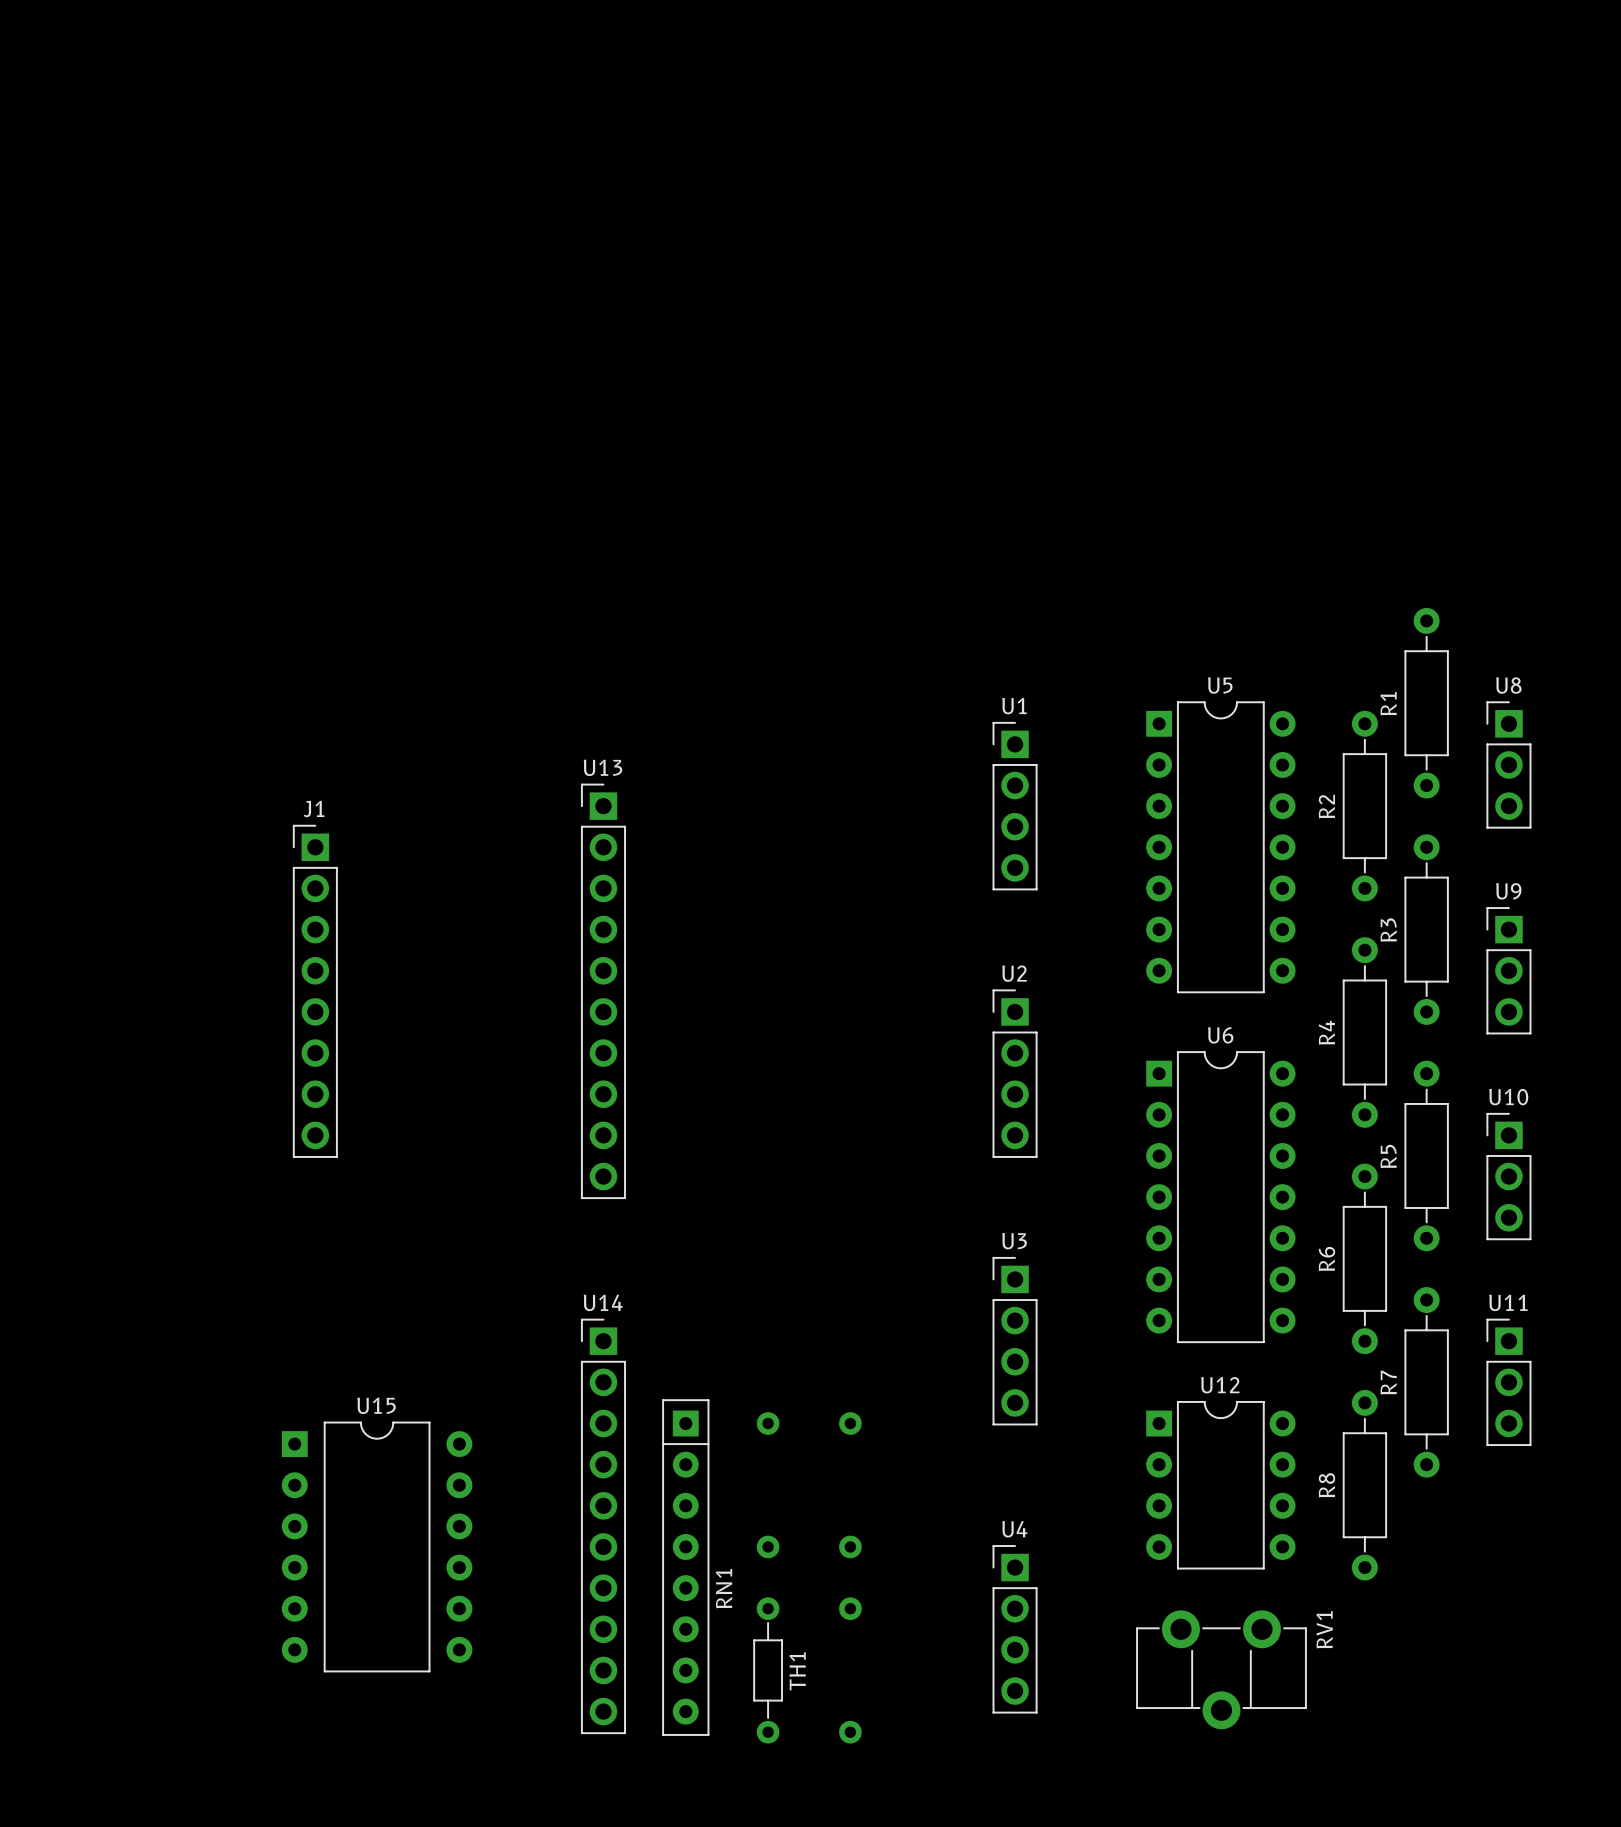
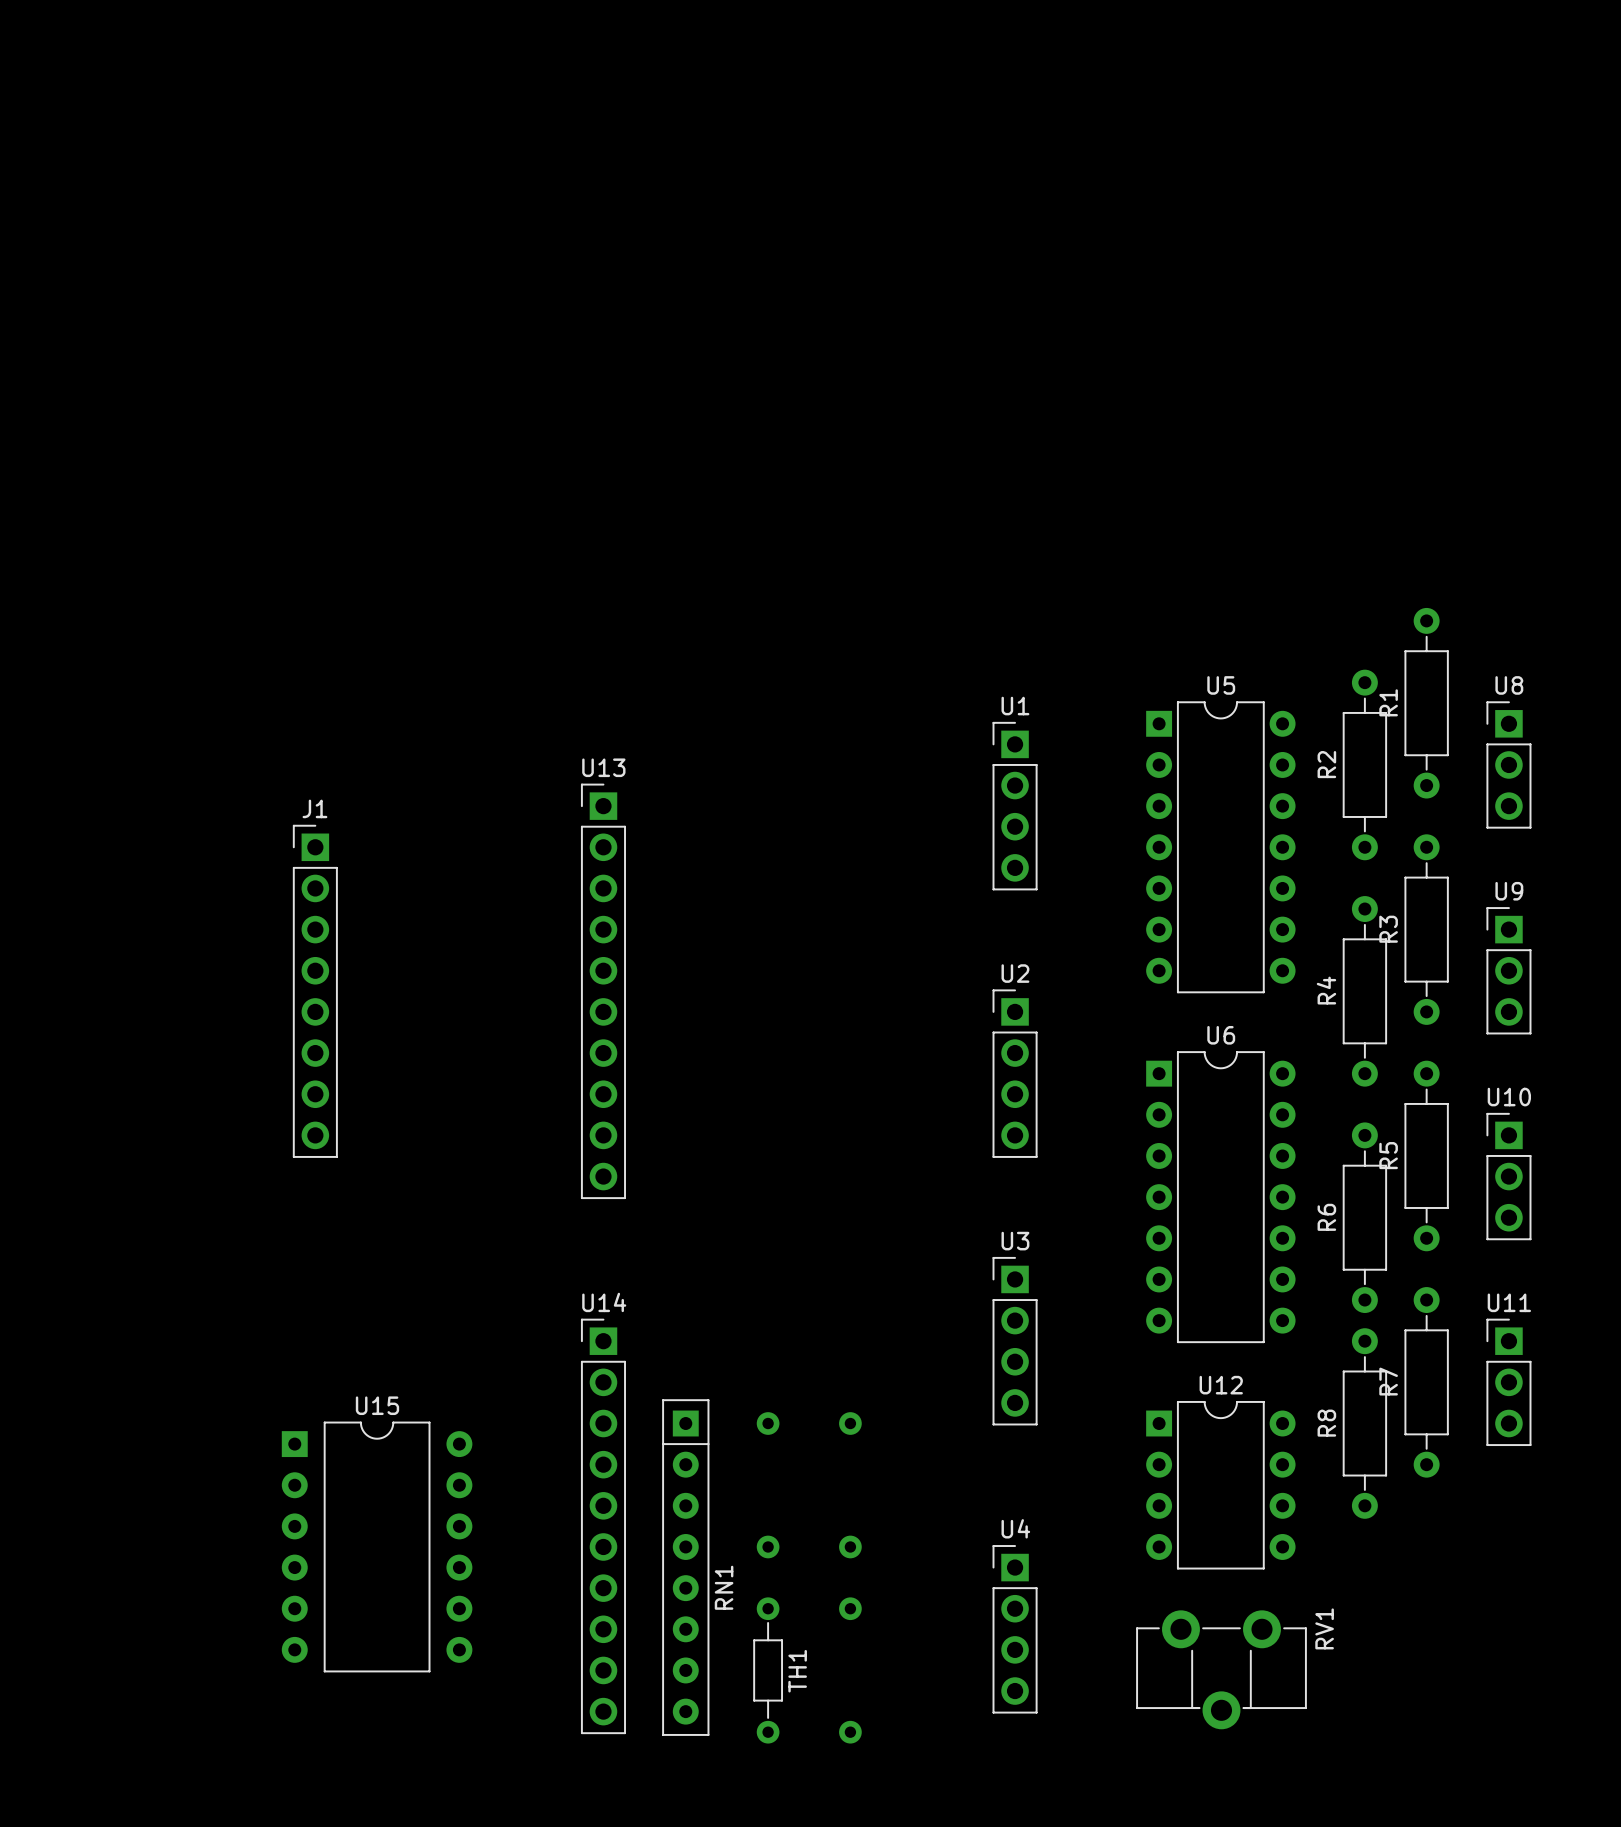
R2 position: (1364, 806) -> (1364, 764)
R4 position: (1364, 1032) -> (1364, 991)
R6 position: (1364, 1258) -> (1364, 1217)
R8 position: (1364, 1485) -> (1364, 1423)

